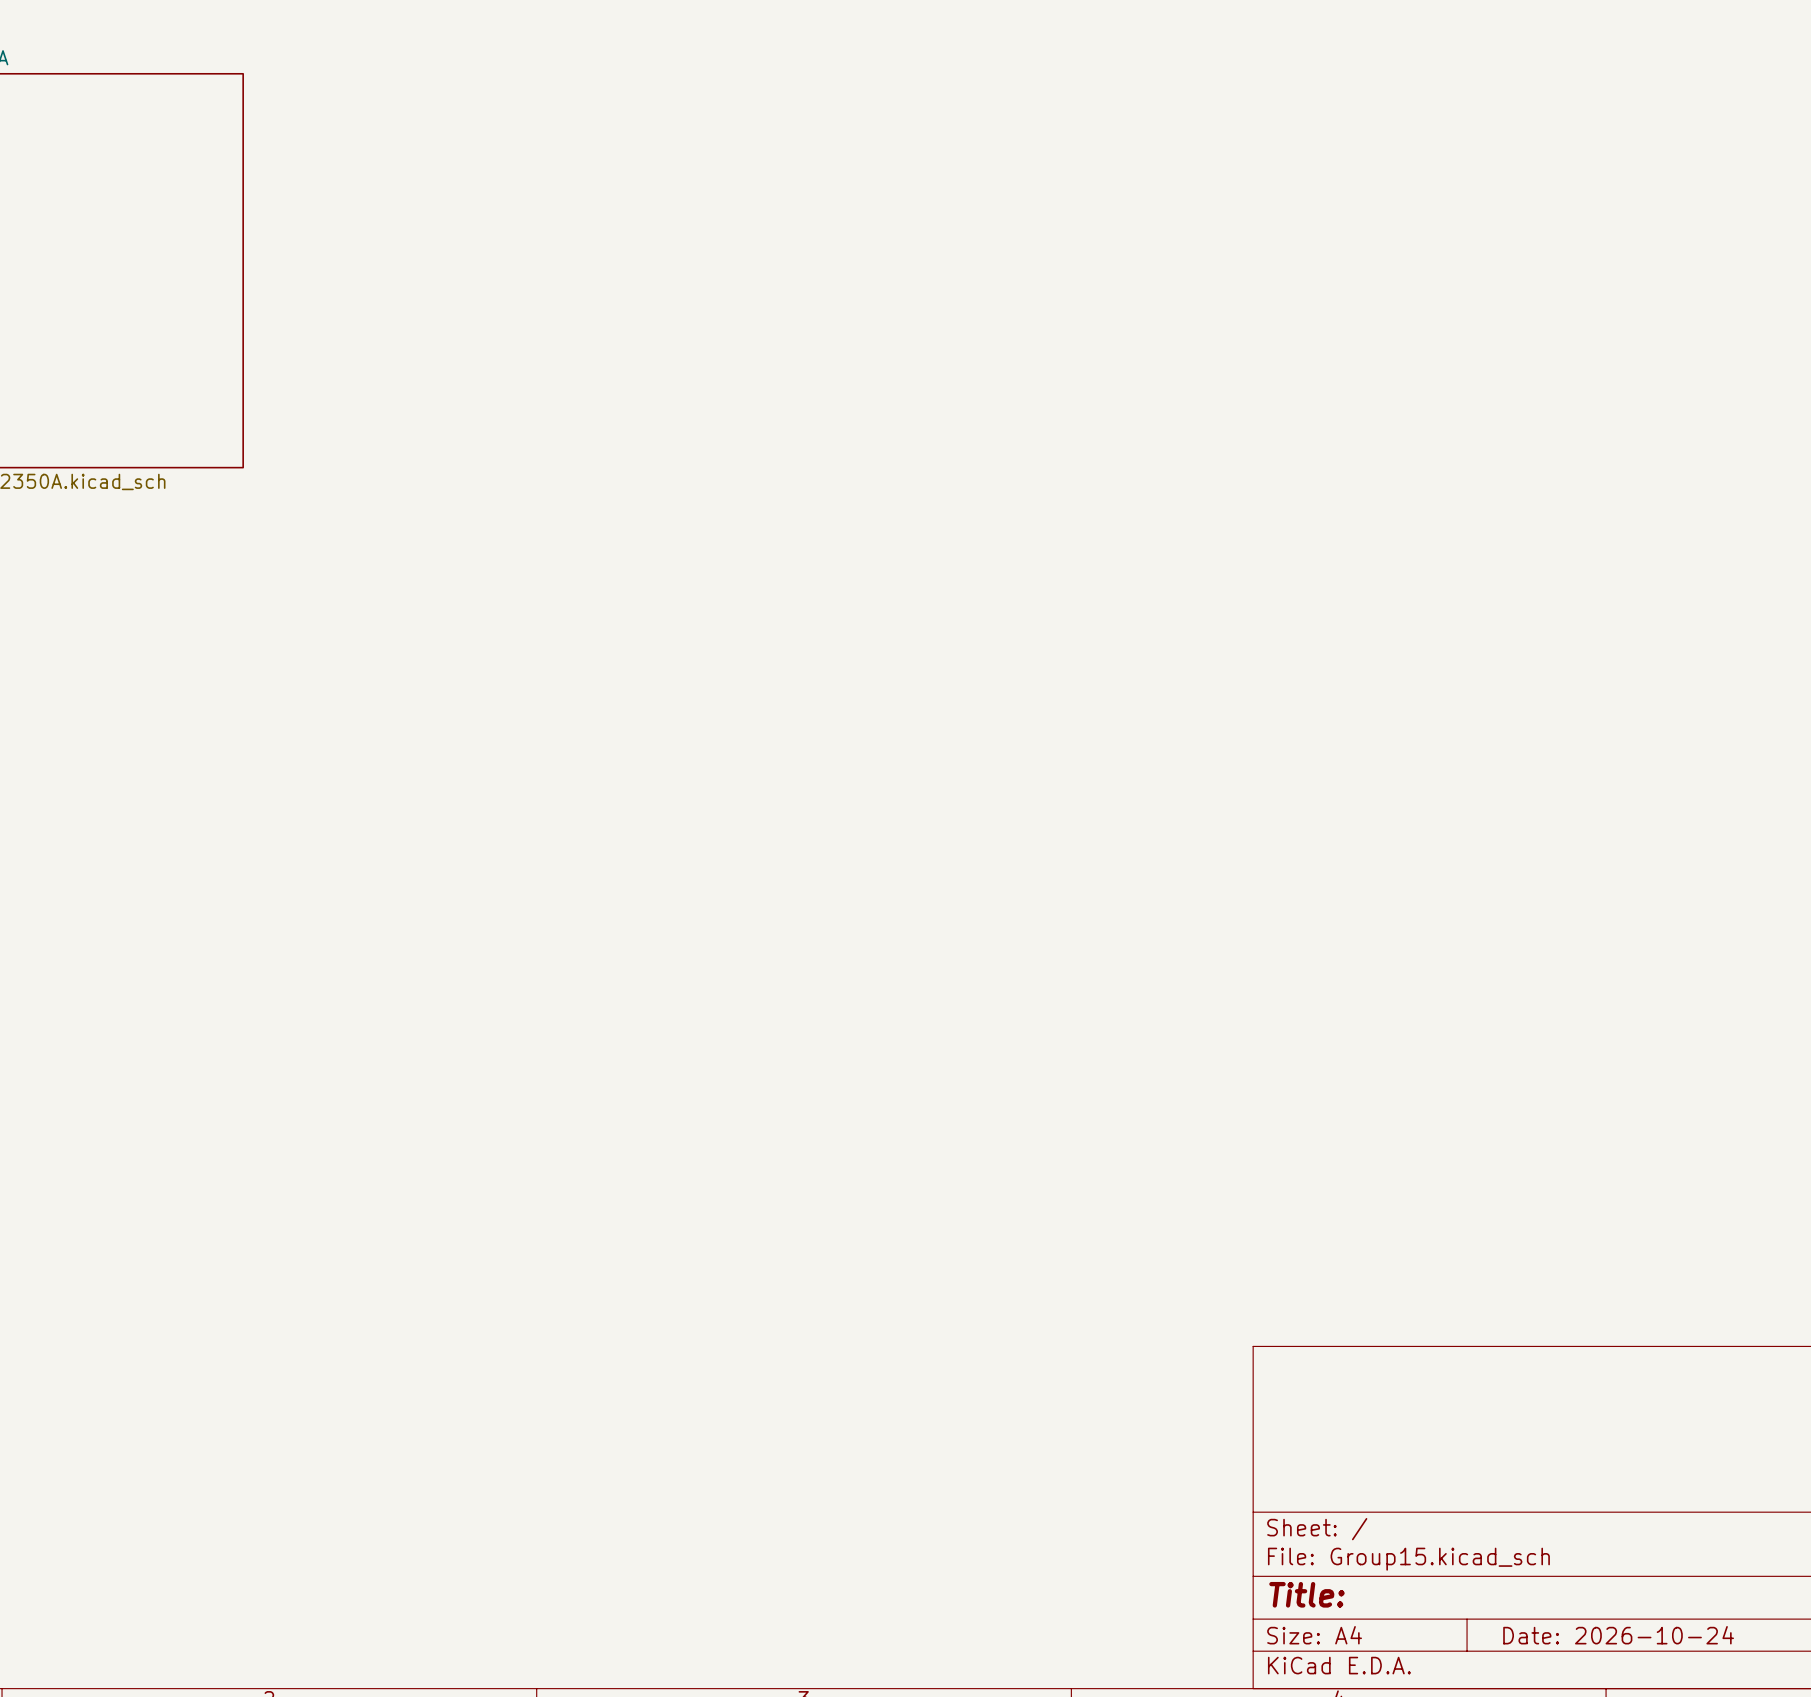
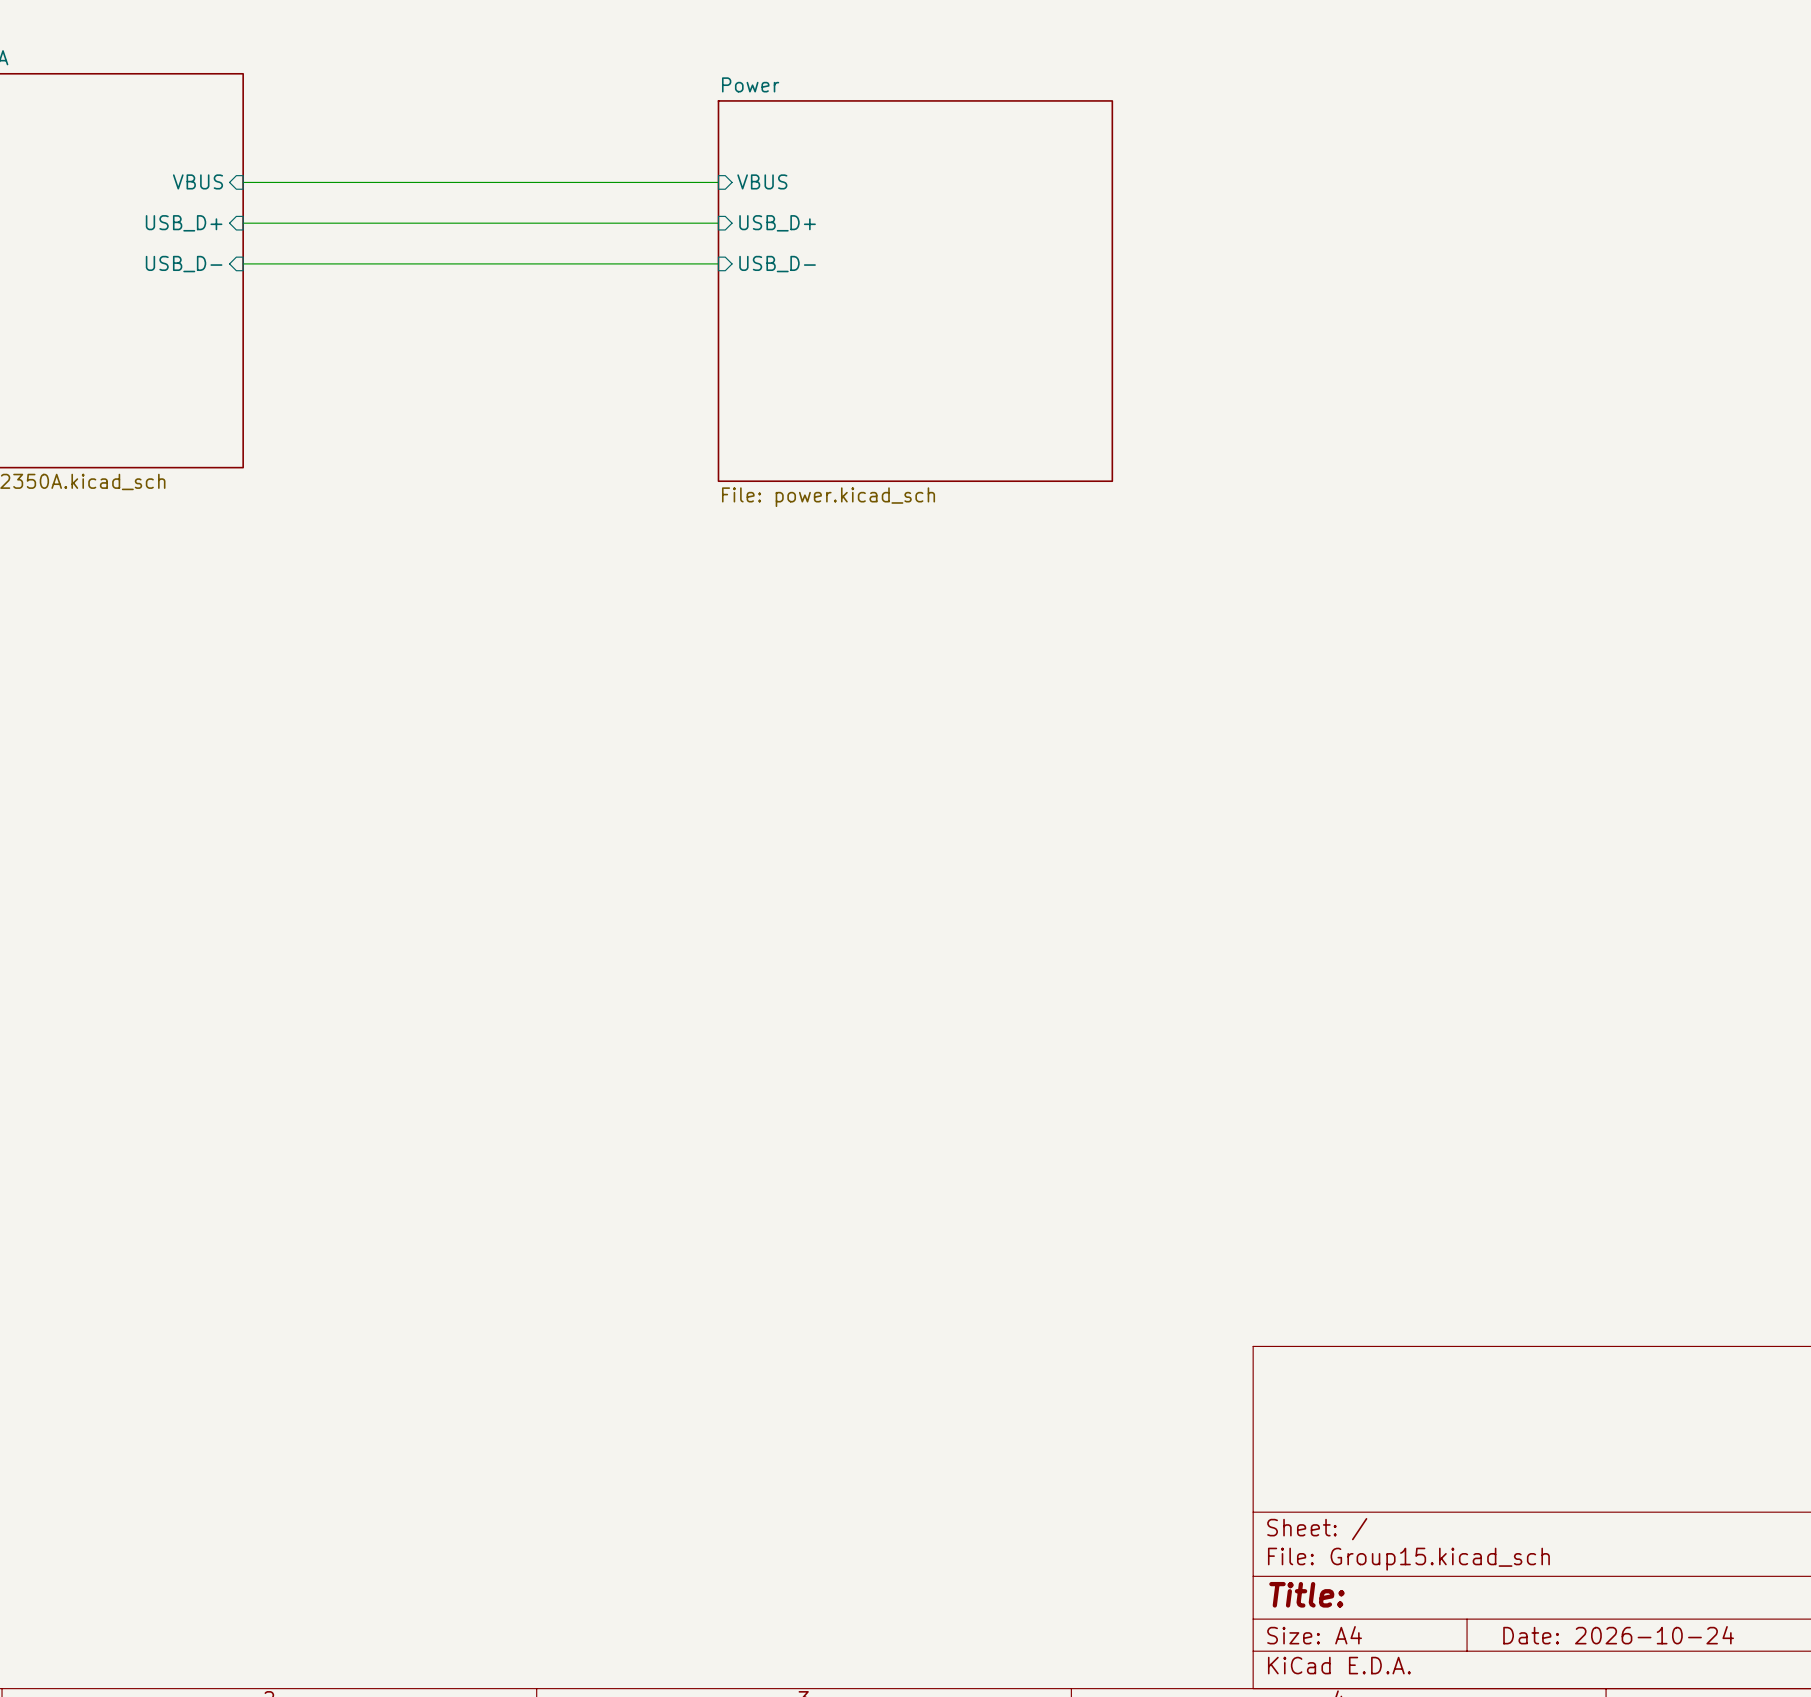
sheet pin: none -> VBUS (198, 181)
sheet pin: none -> VBUS (762, 181)
wire: none -> (243, 182) (718, 182)
sheet pin: none -> USB_D+ (184, 223)
wire: none -> (243, 223) (718, 223)
sheet pin: none -> USB_D+ (777, 223)
wire: none -> (243, 263) (718, 263)
sheet pin: none -> USB_D- (184, 264)
sheet pin: none -> USB_D- (777, 264)
sheet Power: none -> File: power.kicad_sch (915, 291)

